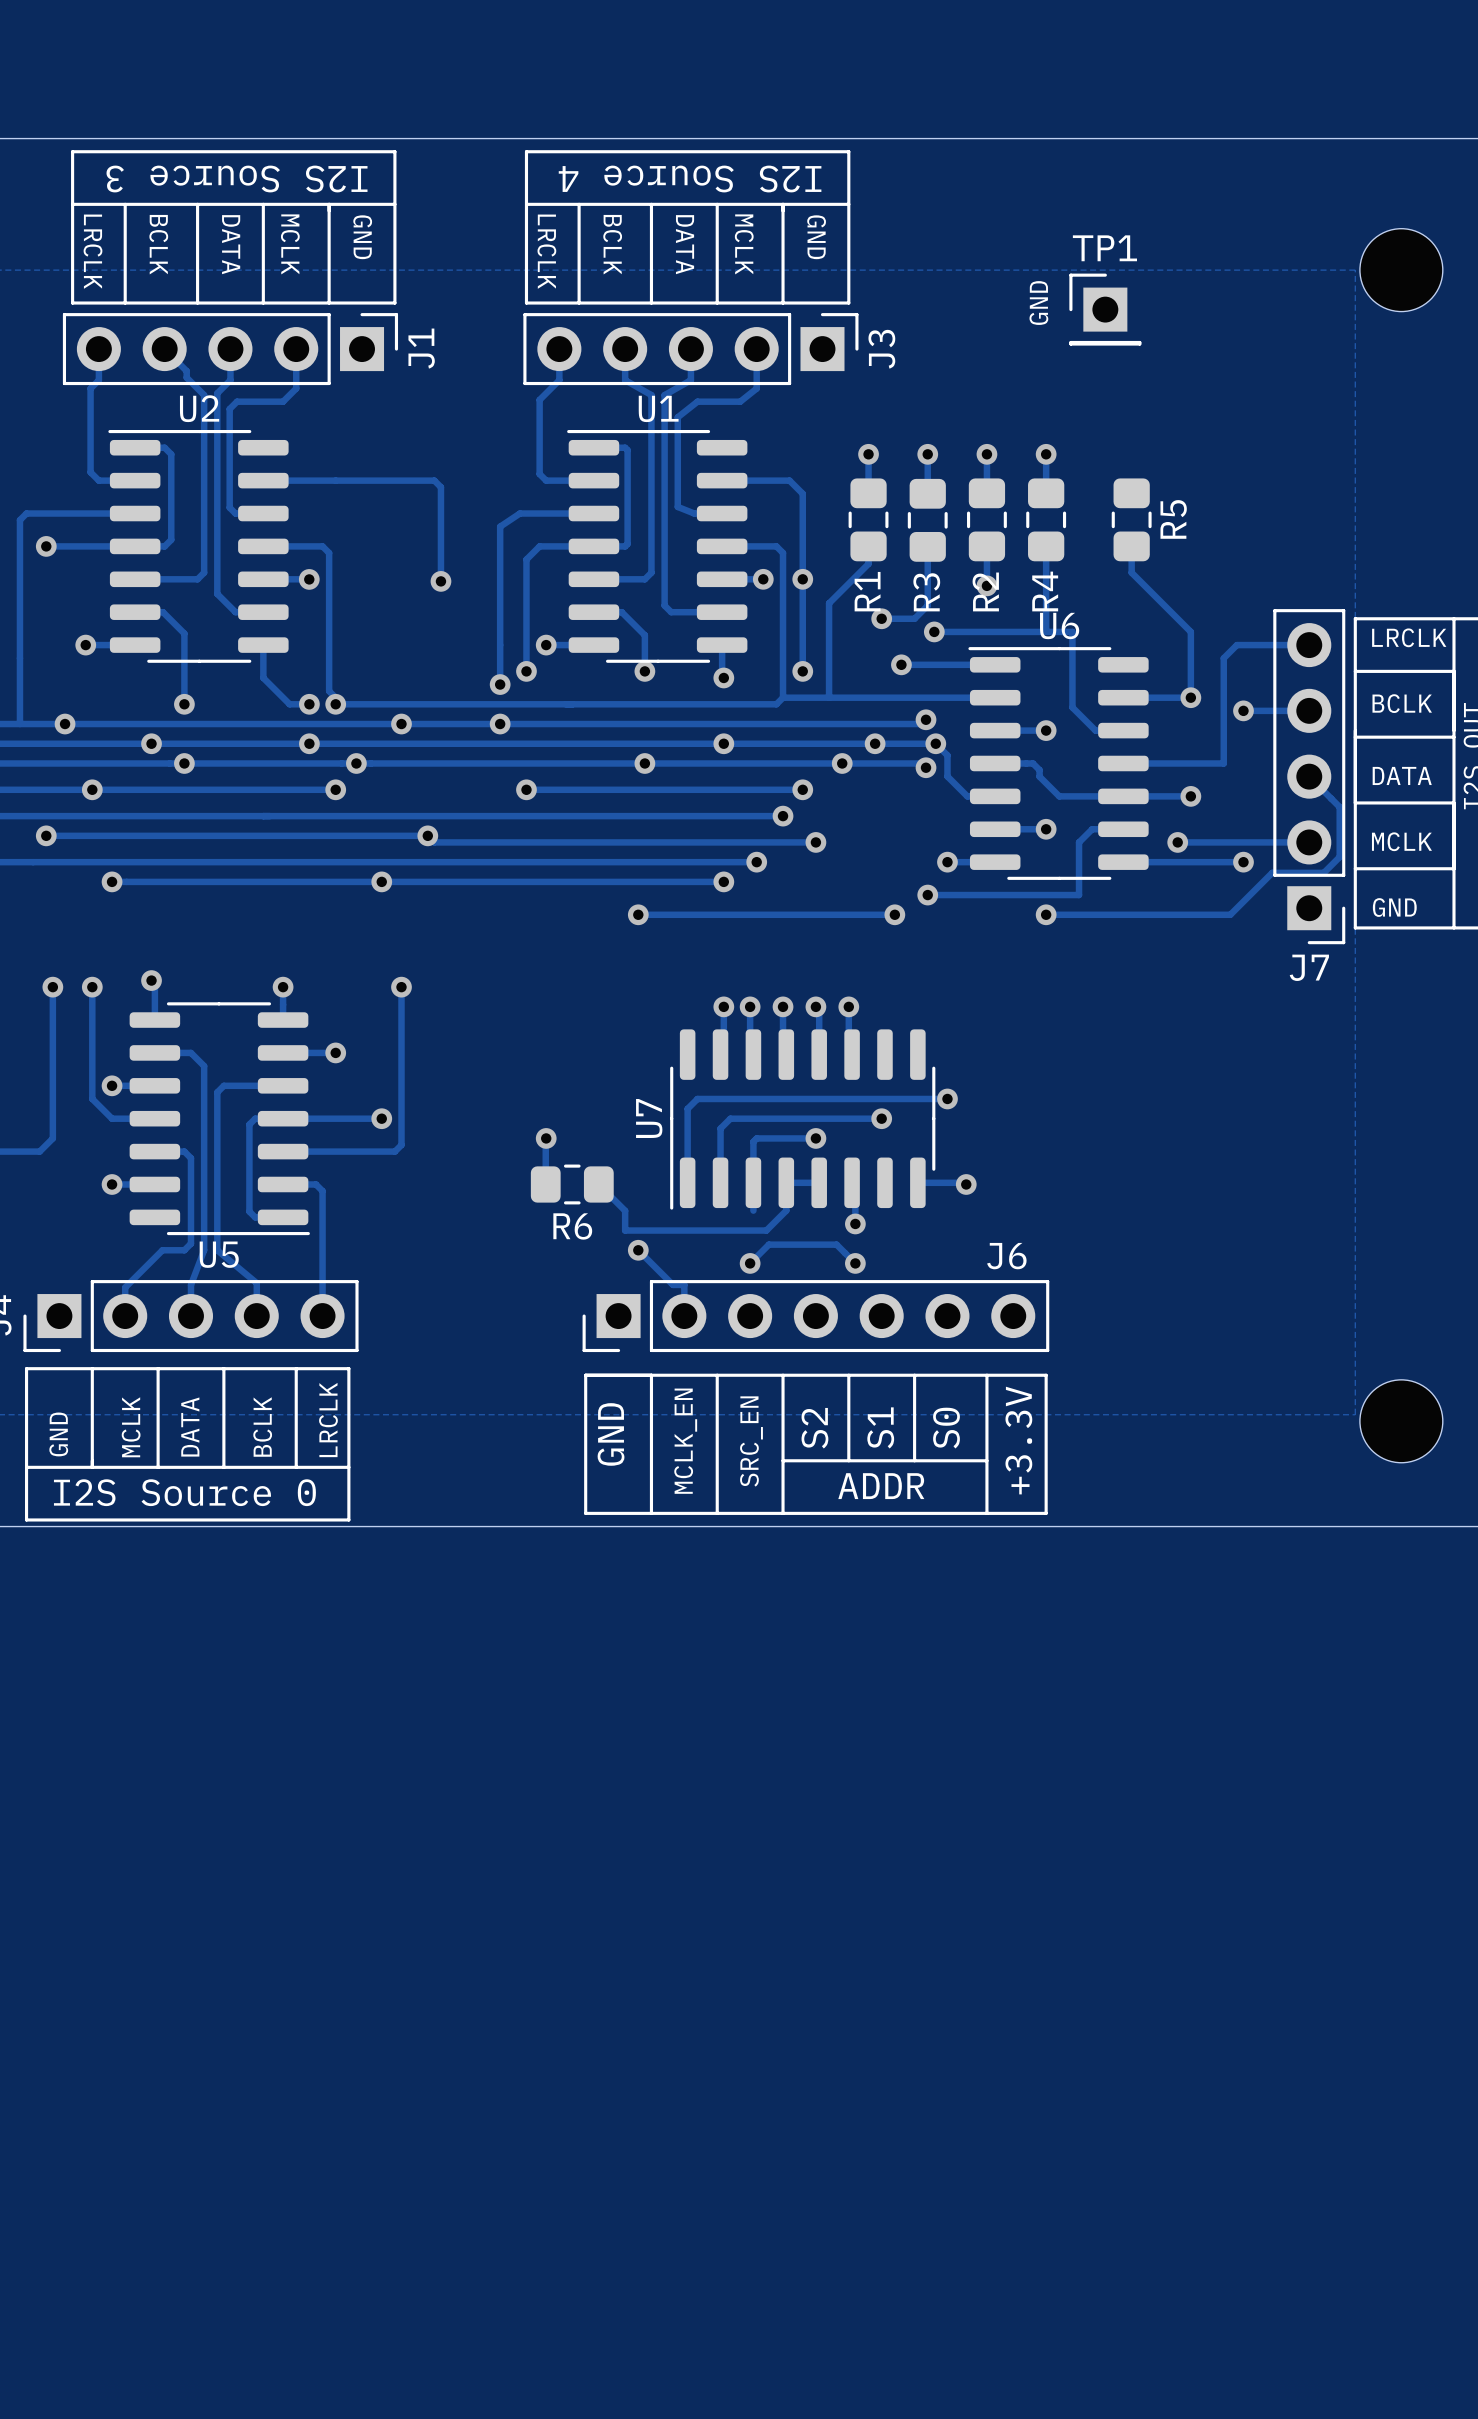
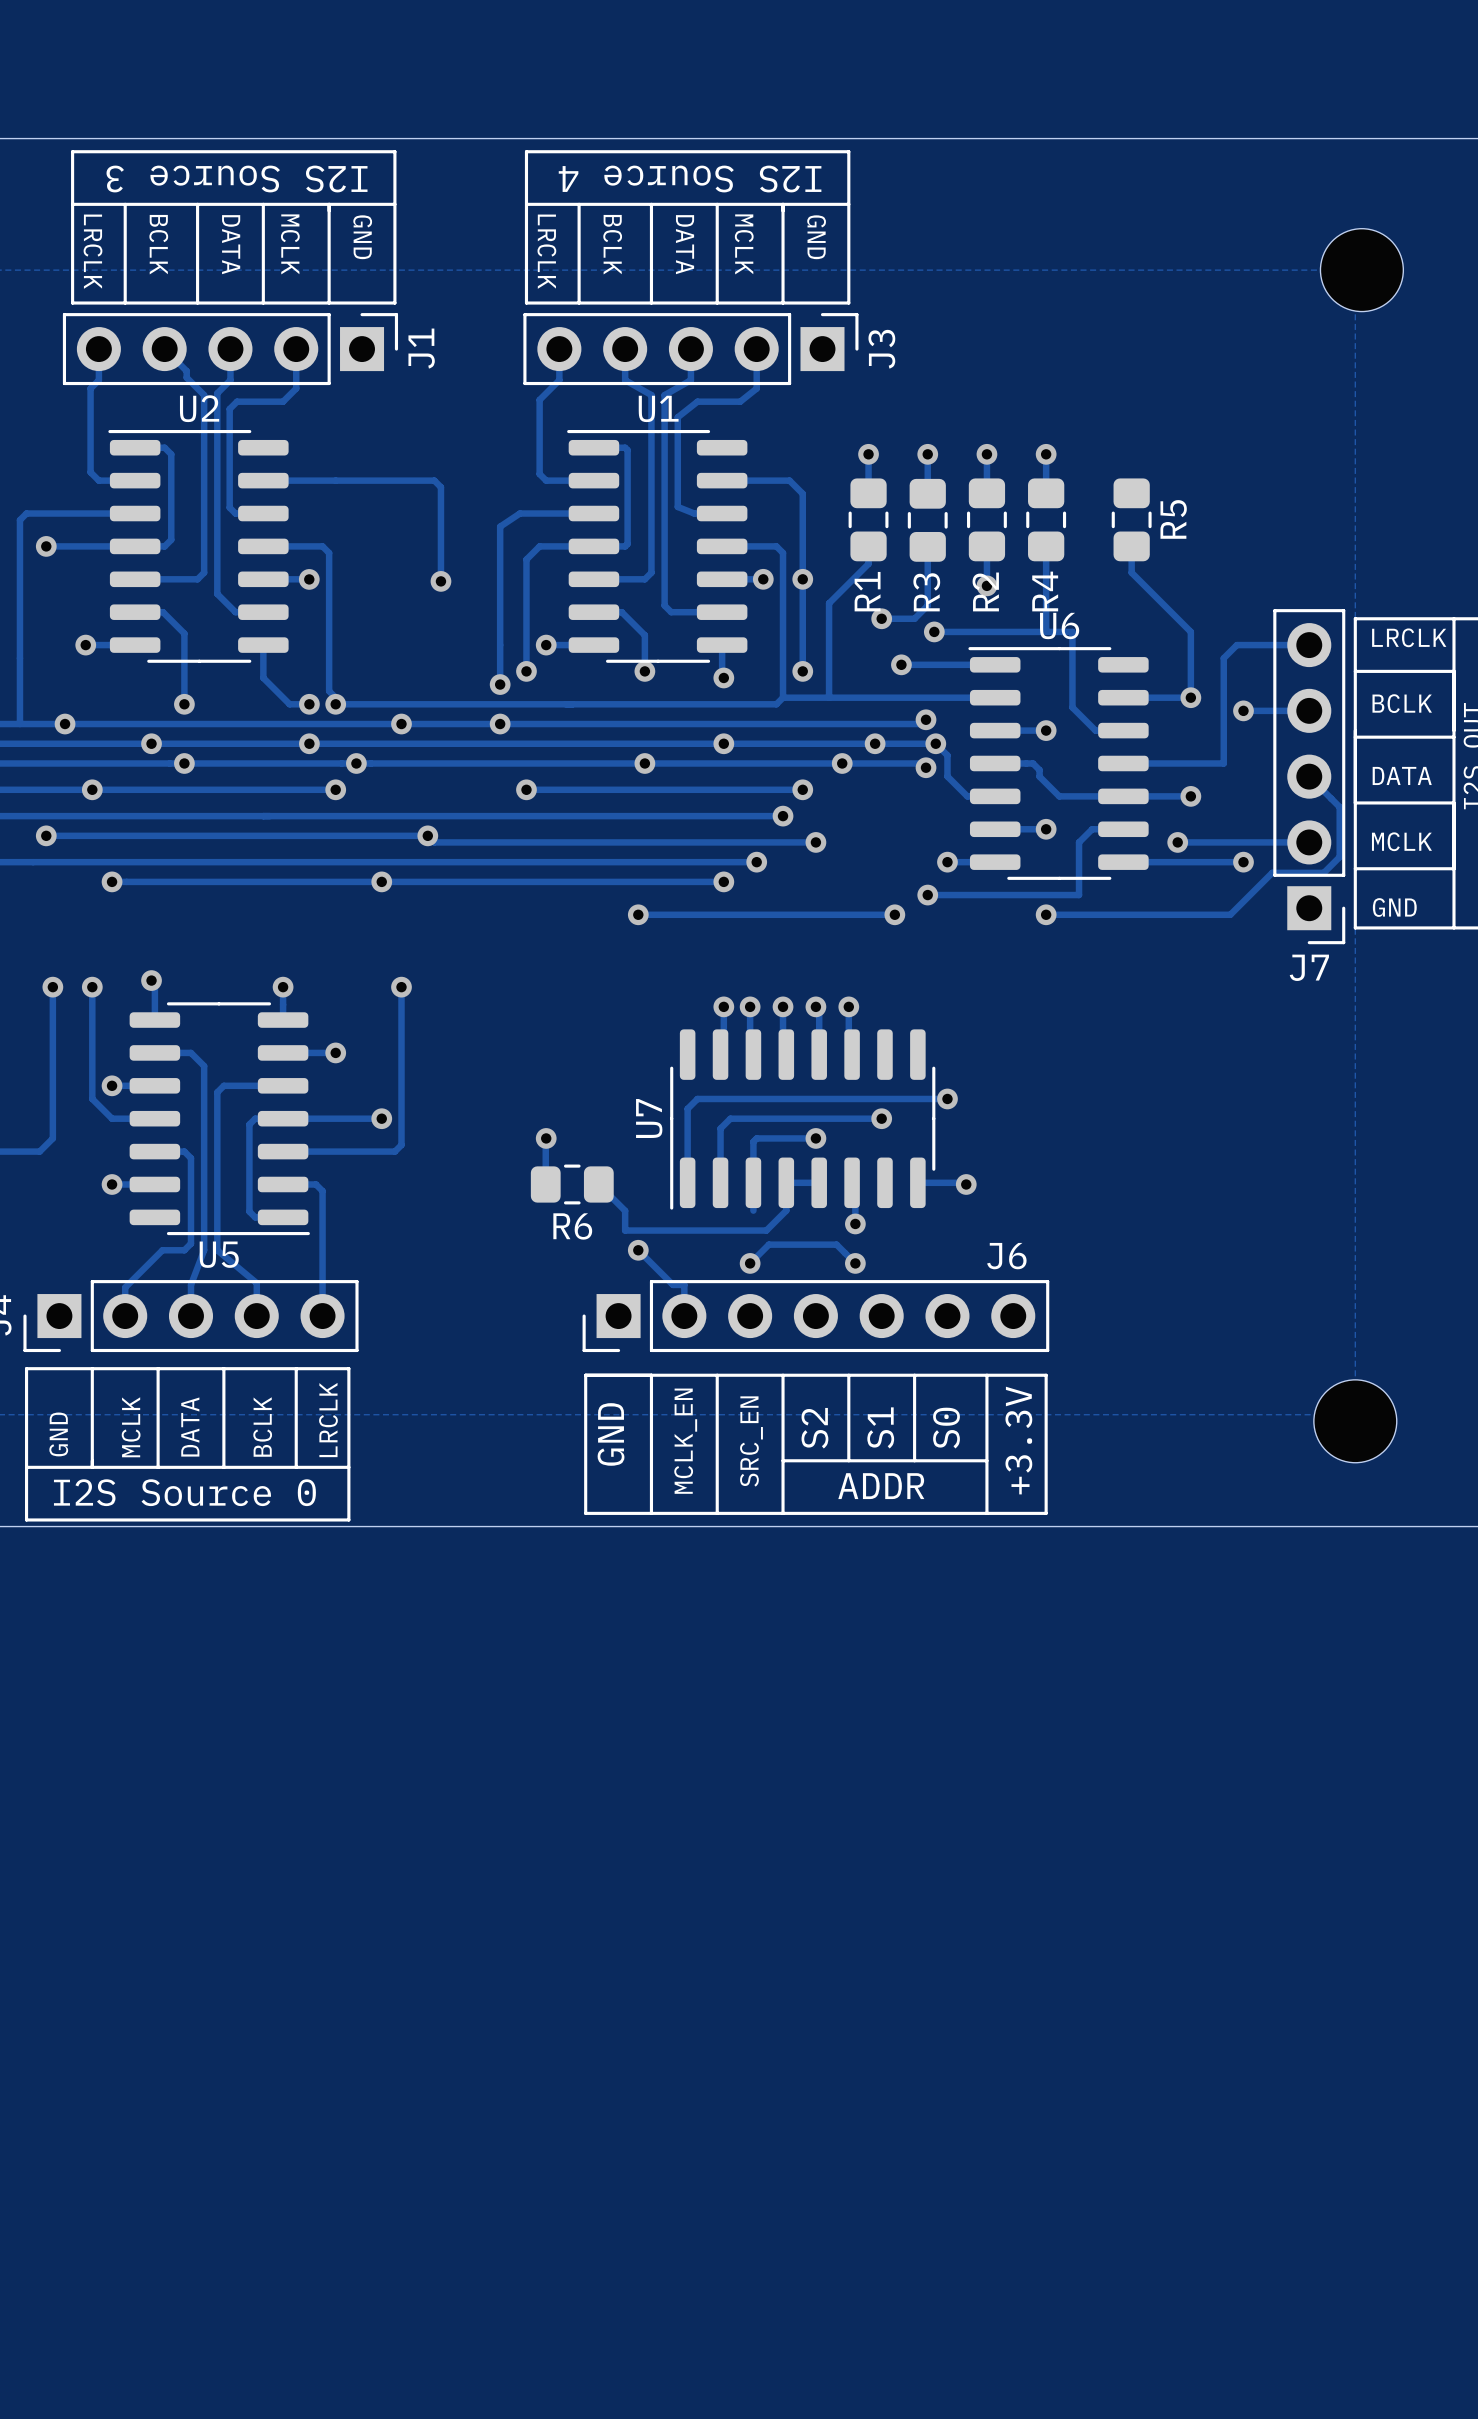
part position: (1401, 270) -> (1361, 270)
text: GND (1038, 303) -> none
TP1: (1105, 309) -> none
part position: (1401, 1421) -> (1355, 1421)

